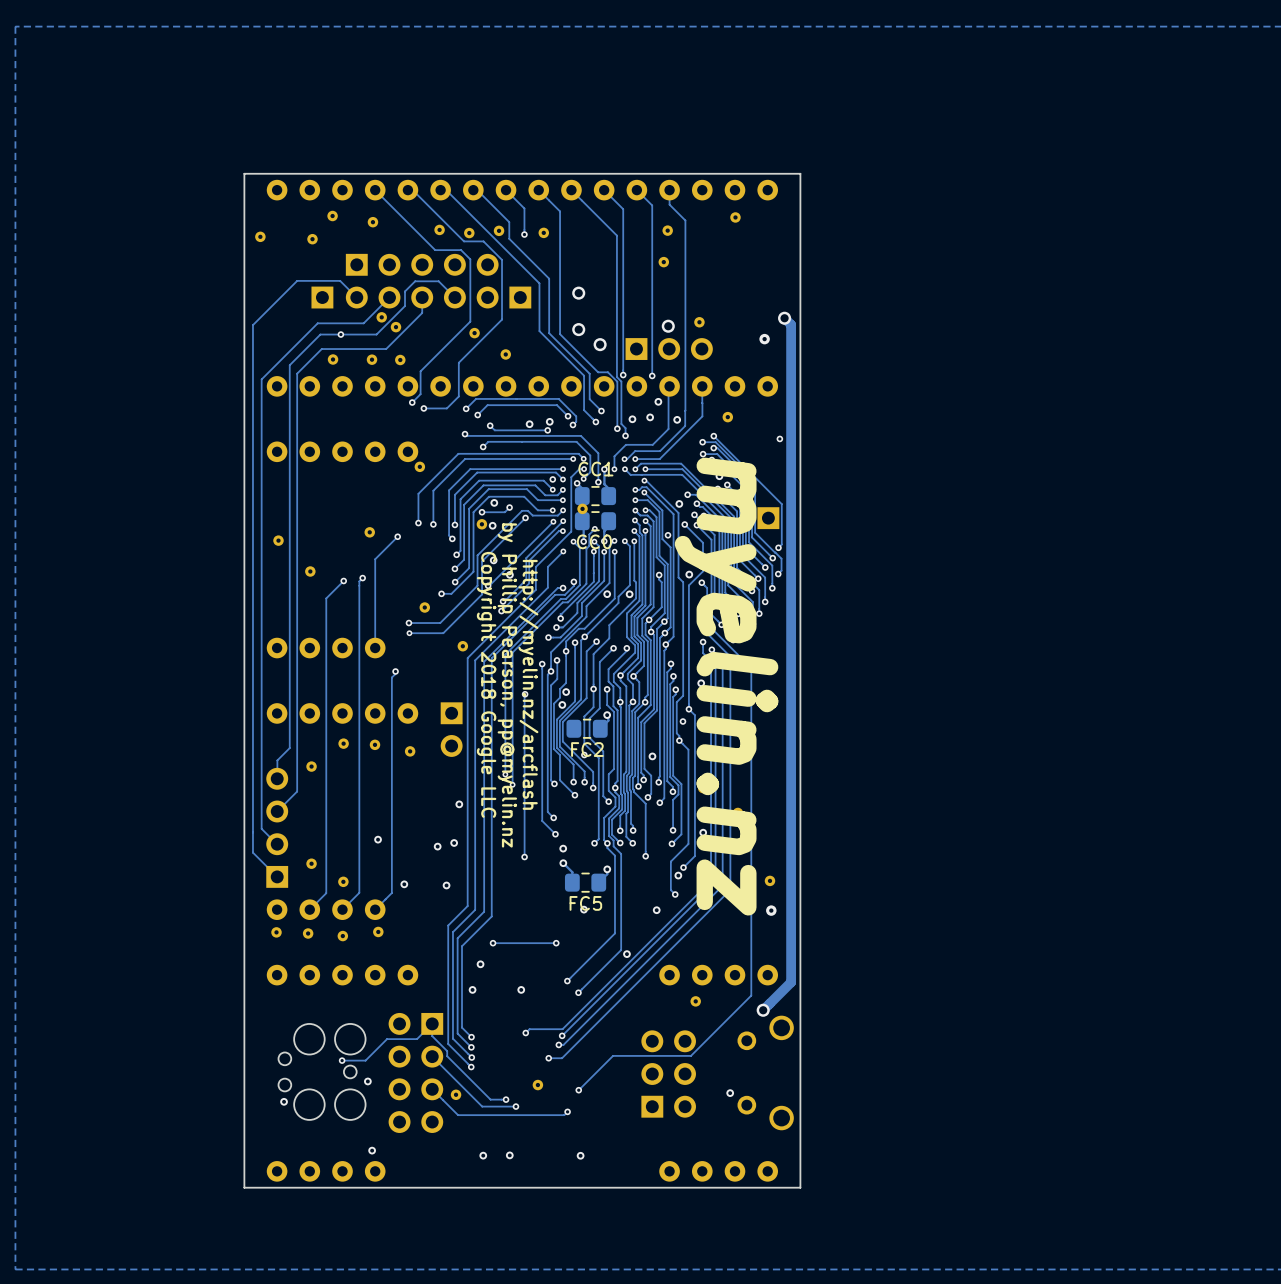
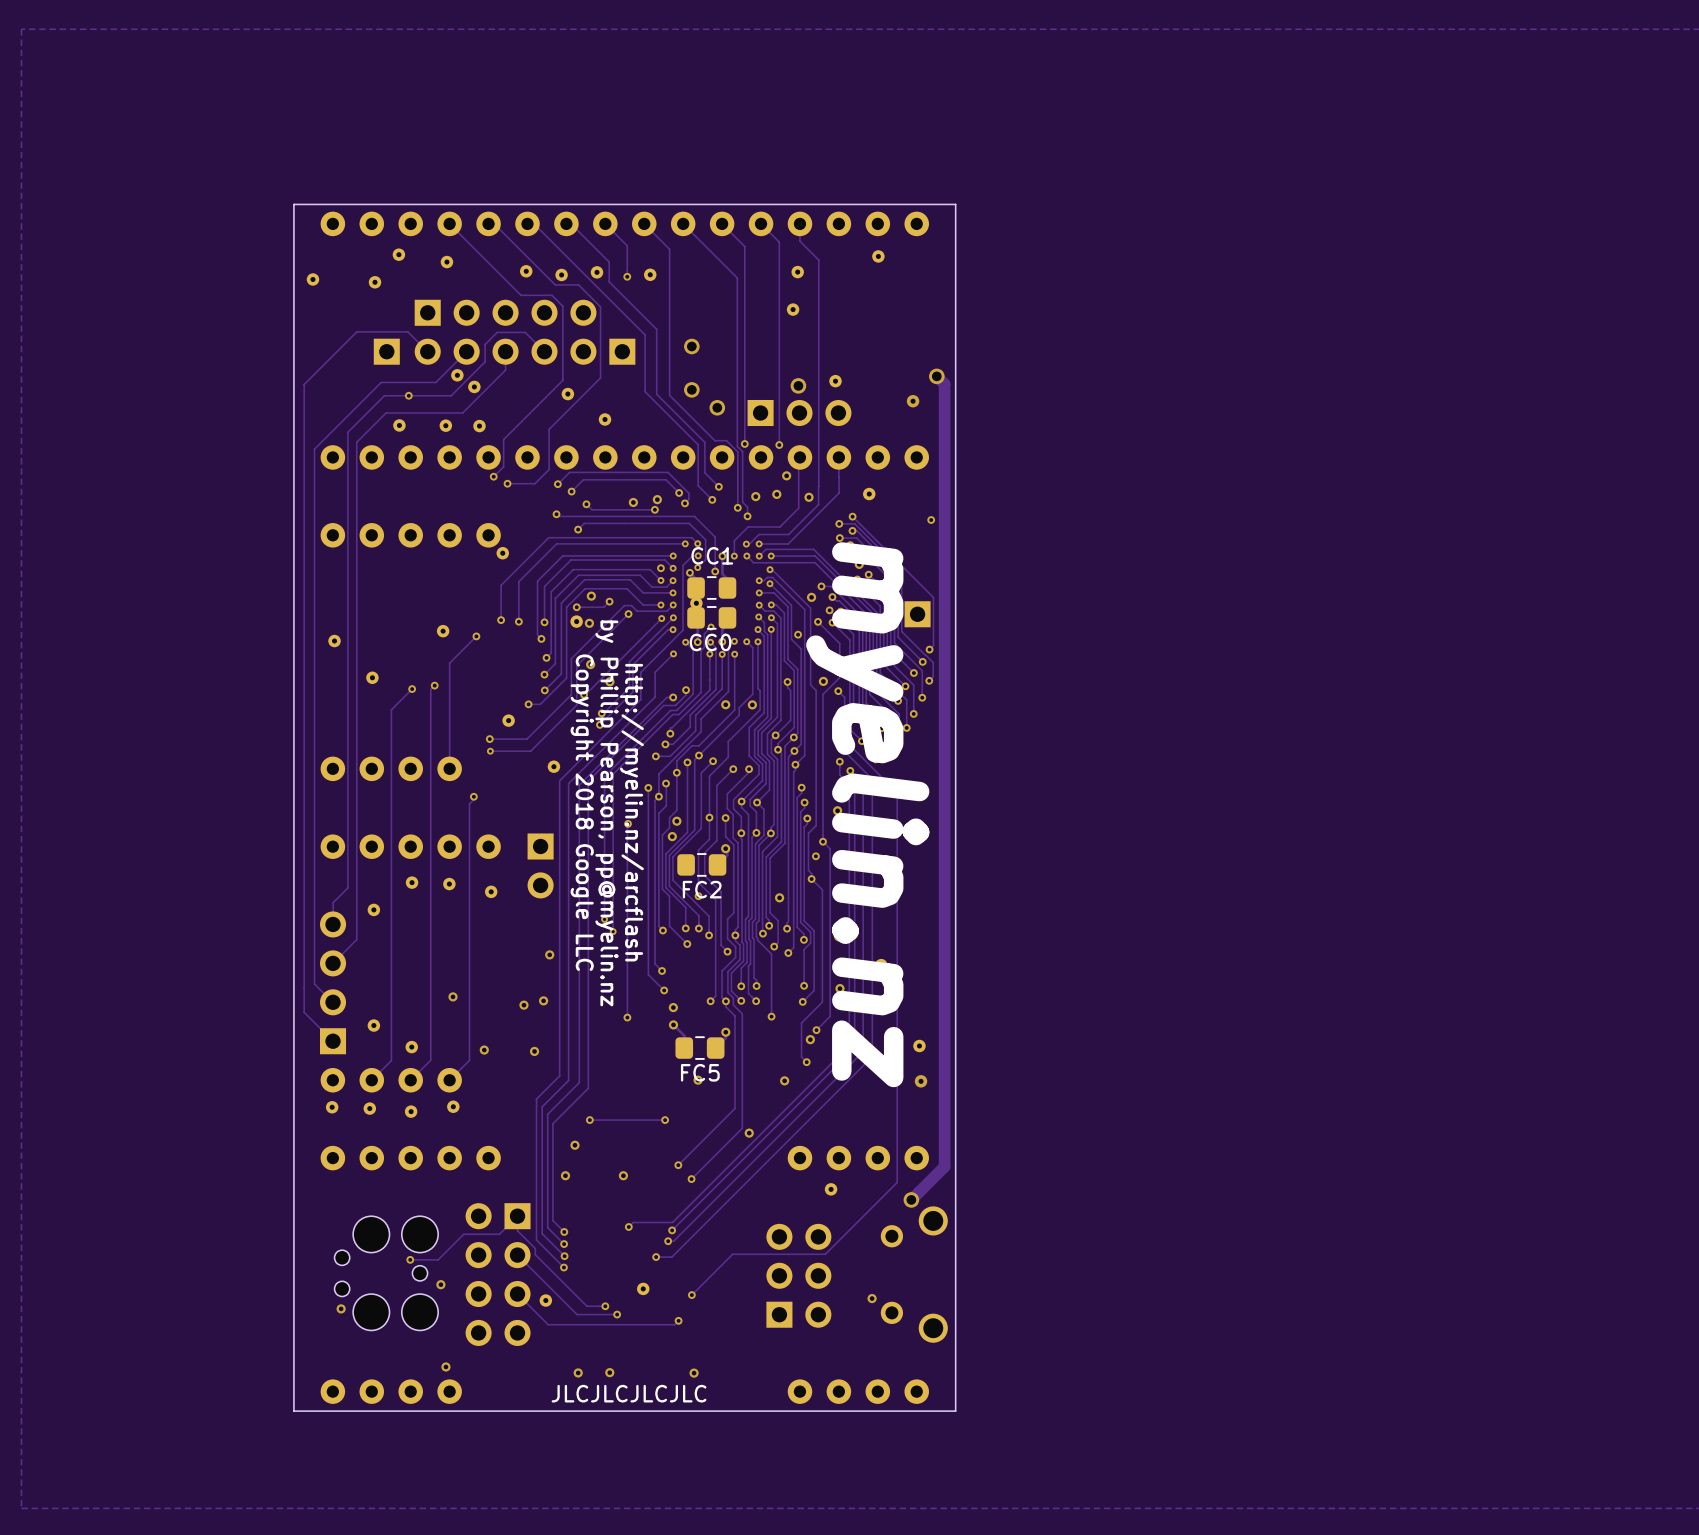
text: none -> JLCJLCJLCJLC (629, 1393)

